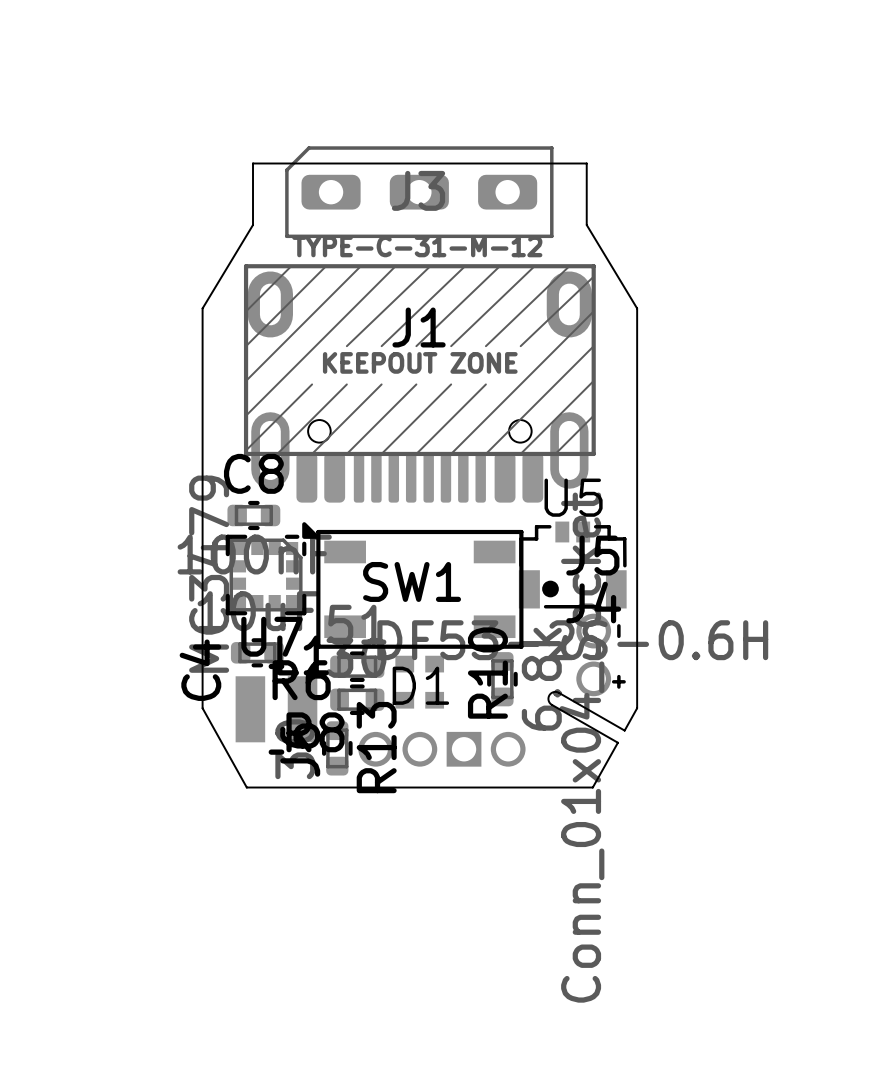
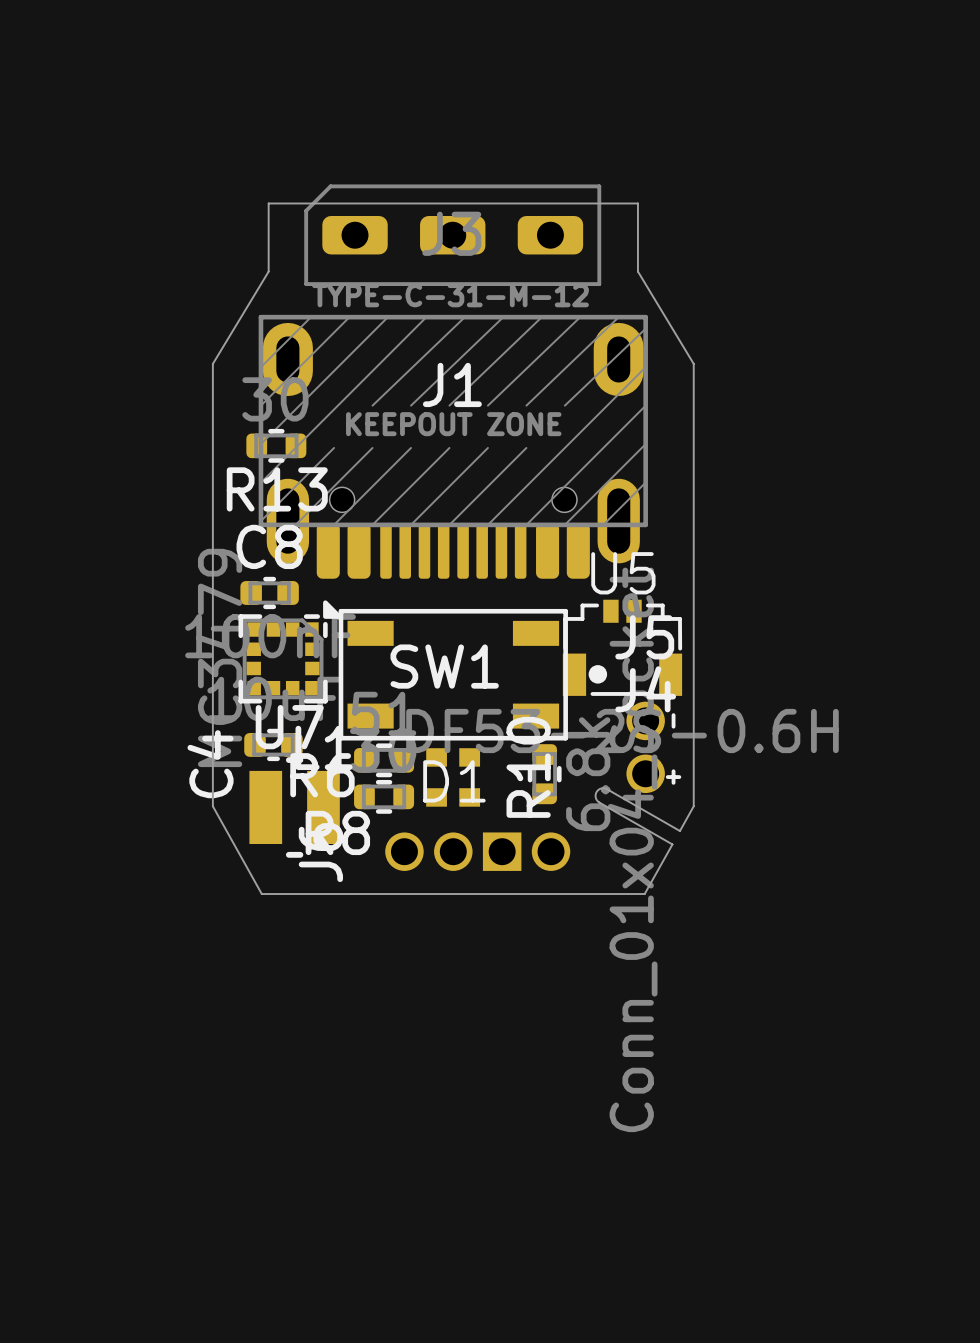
R13 rotation: 0° (337, 748) -> 90° clockwise (276, 445)
R13 position: (337, 748) -> (276, 445)

